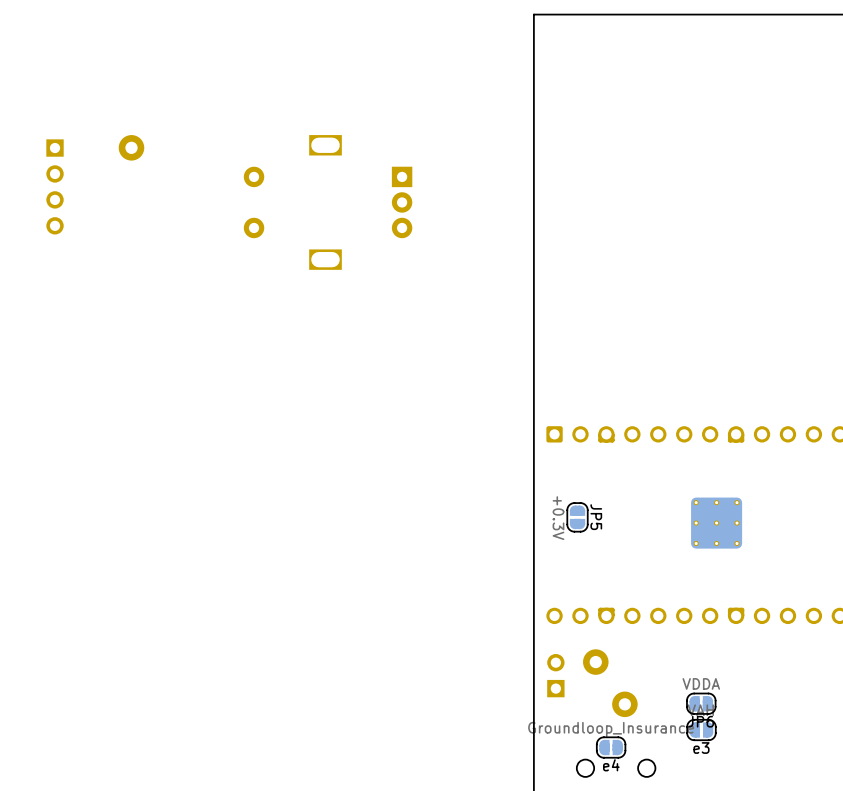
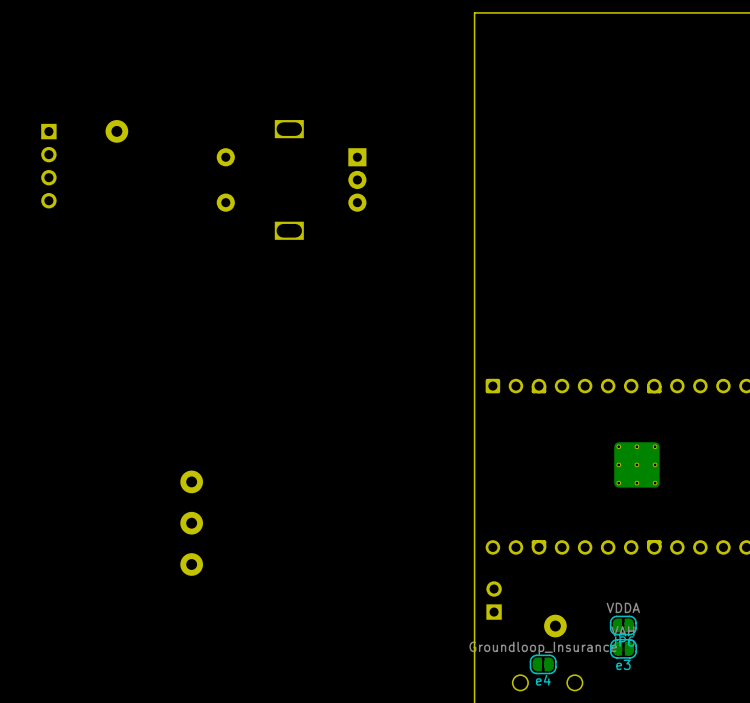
JP5: +0.3V (577, 517) -> none
part: none -> (191, 481)
part: none -> (191, 523)
part: none -> (191, 564)
part: (595, 662) -> none

